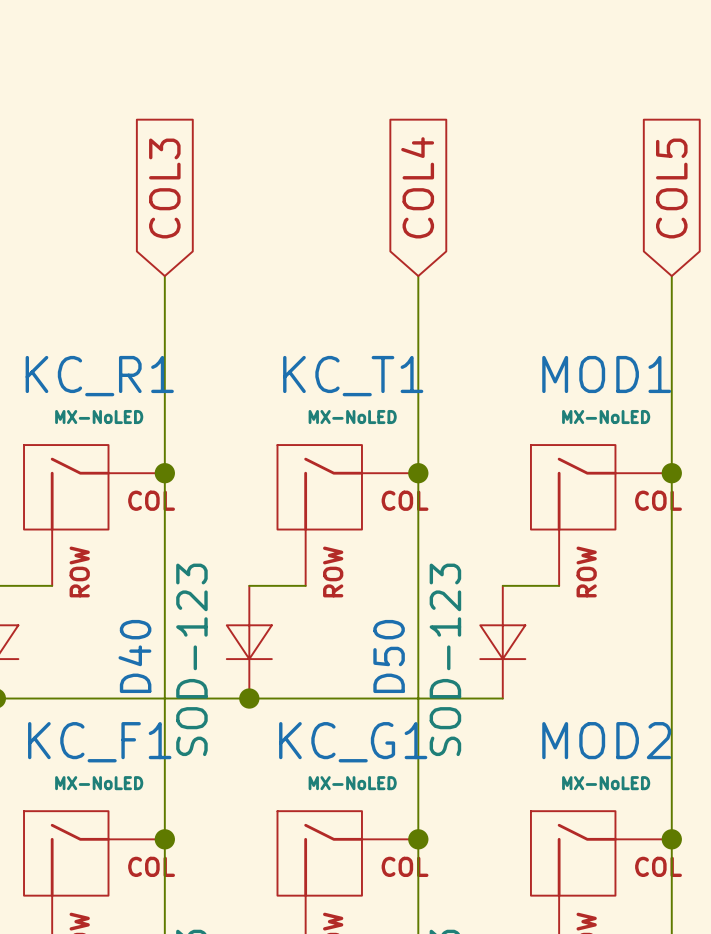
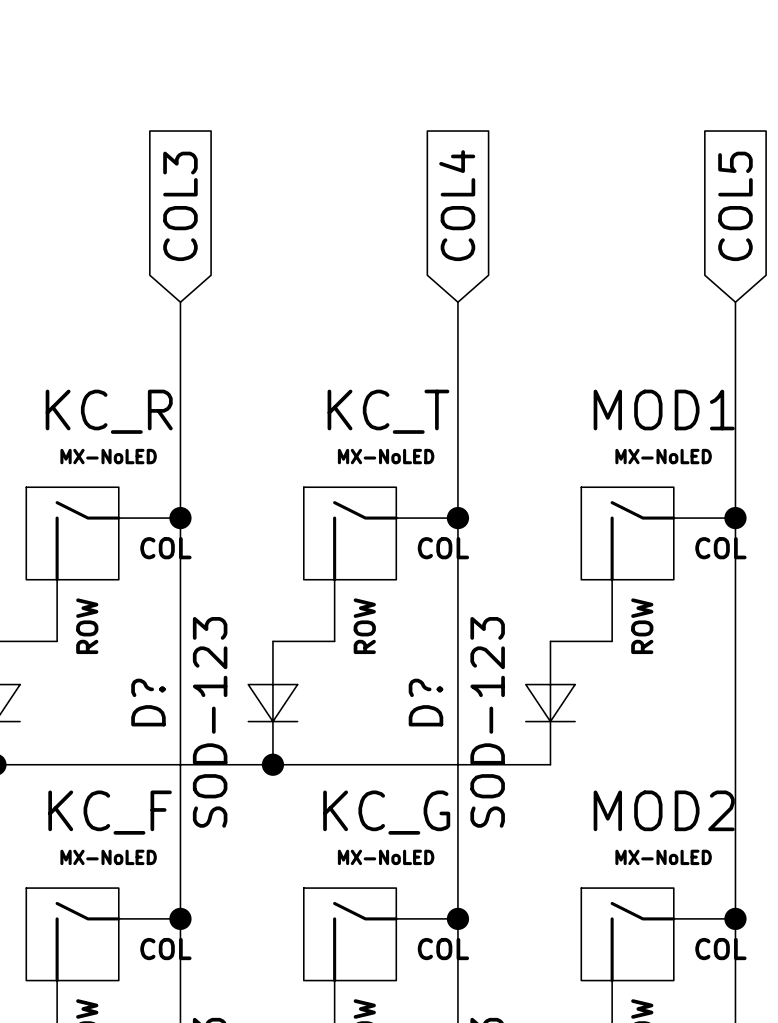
KC_R1 name: KC_R1 (99, 376) -> KC_R (109, 411)
KC_T1 name: KC_T1 (353, 376) -> KC_T (388, 411)
D40 name: D40 (134, 656) -> D? (148, 702)
D50 name: D50 (389, 656) -> D? (425, 702)
KC_F1 name: KC_F1 (99, 742) -> KC_F (110, 812)
KC_G1 name: KC_G1 (353, 742) -> KC_G (386, 812)

